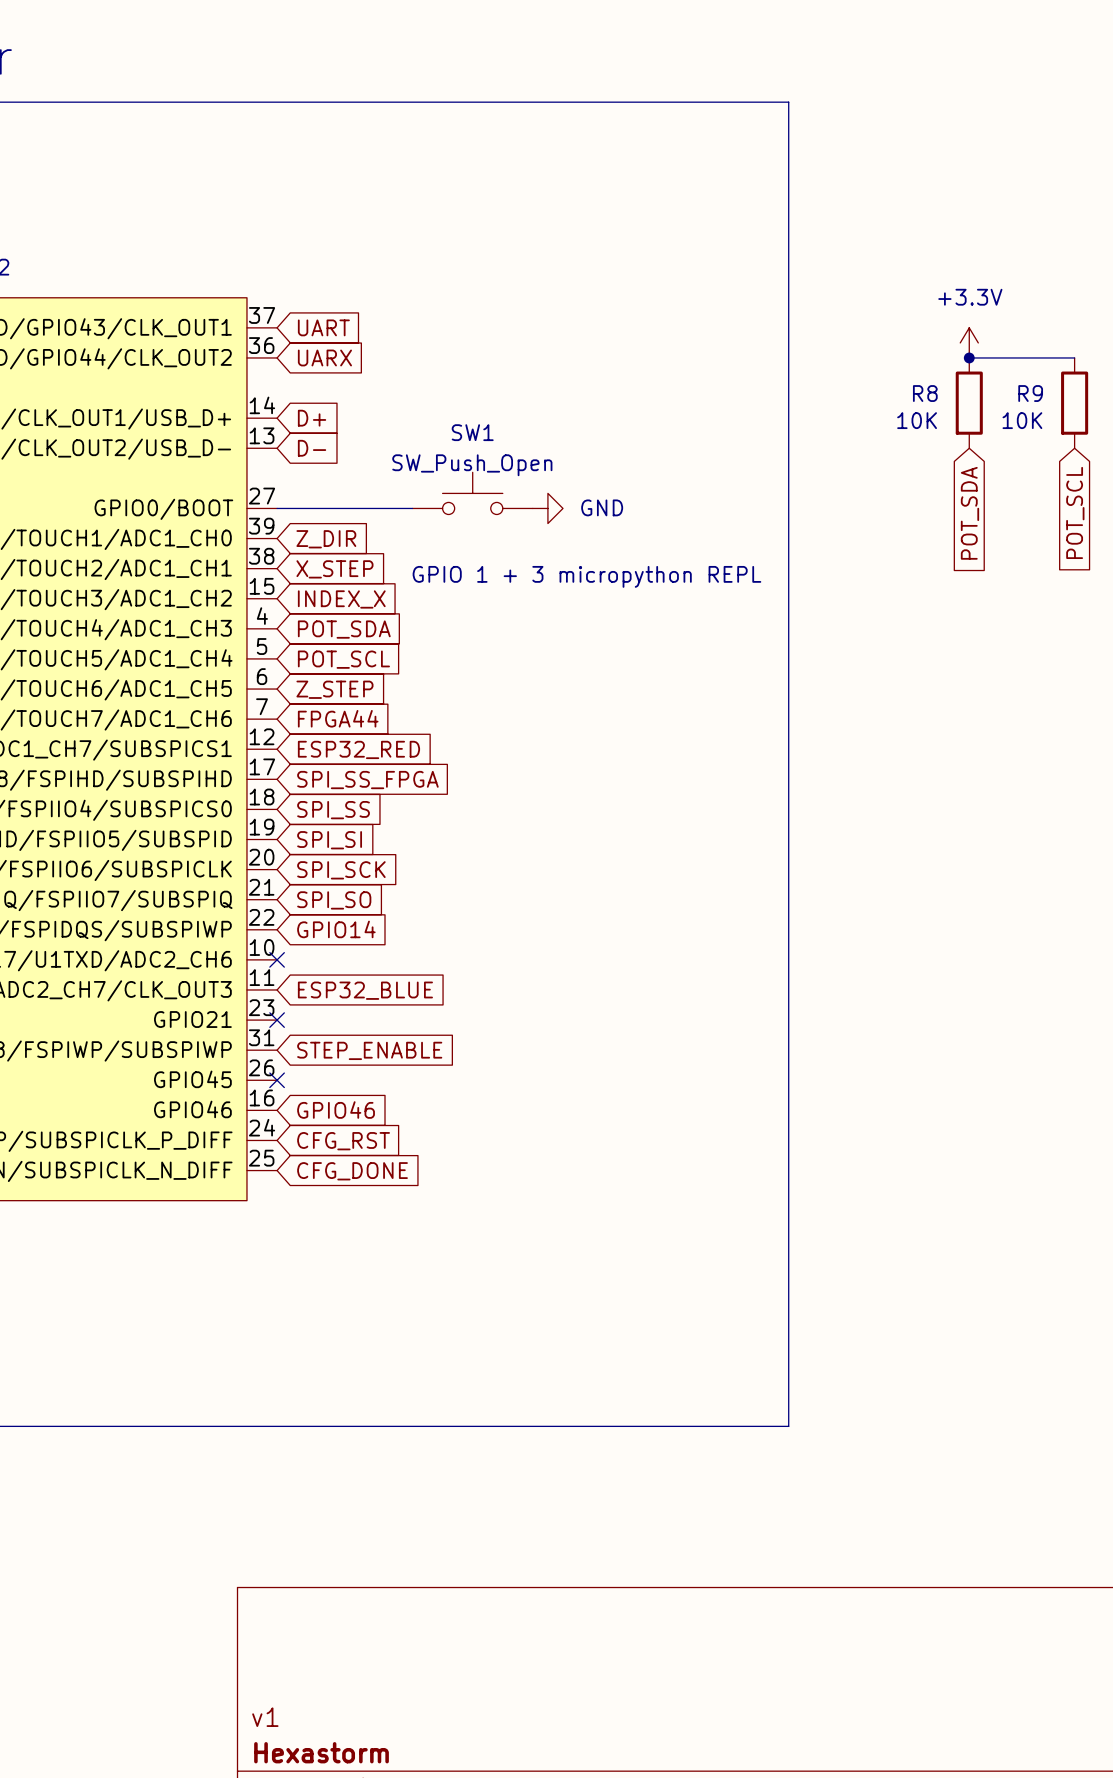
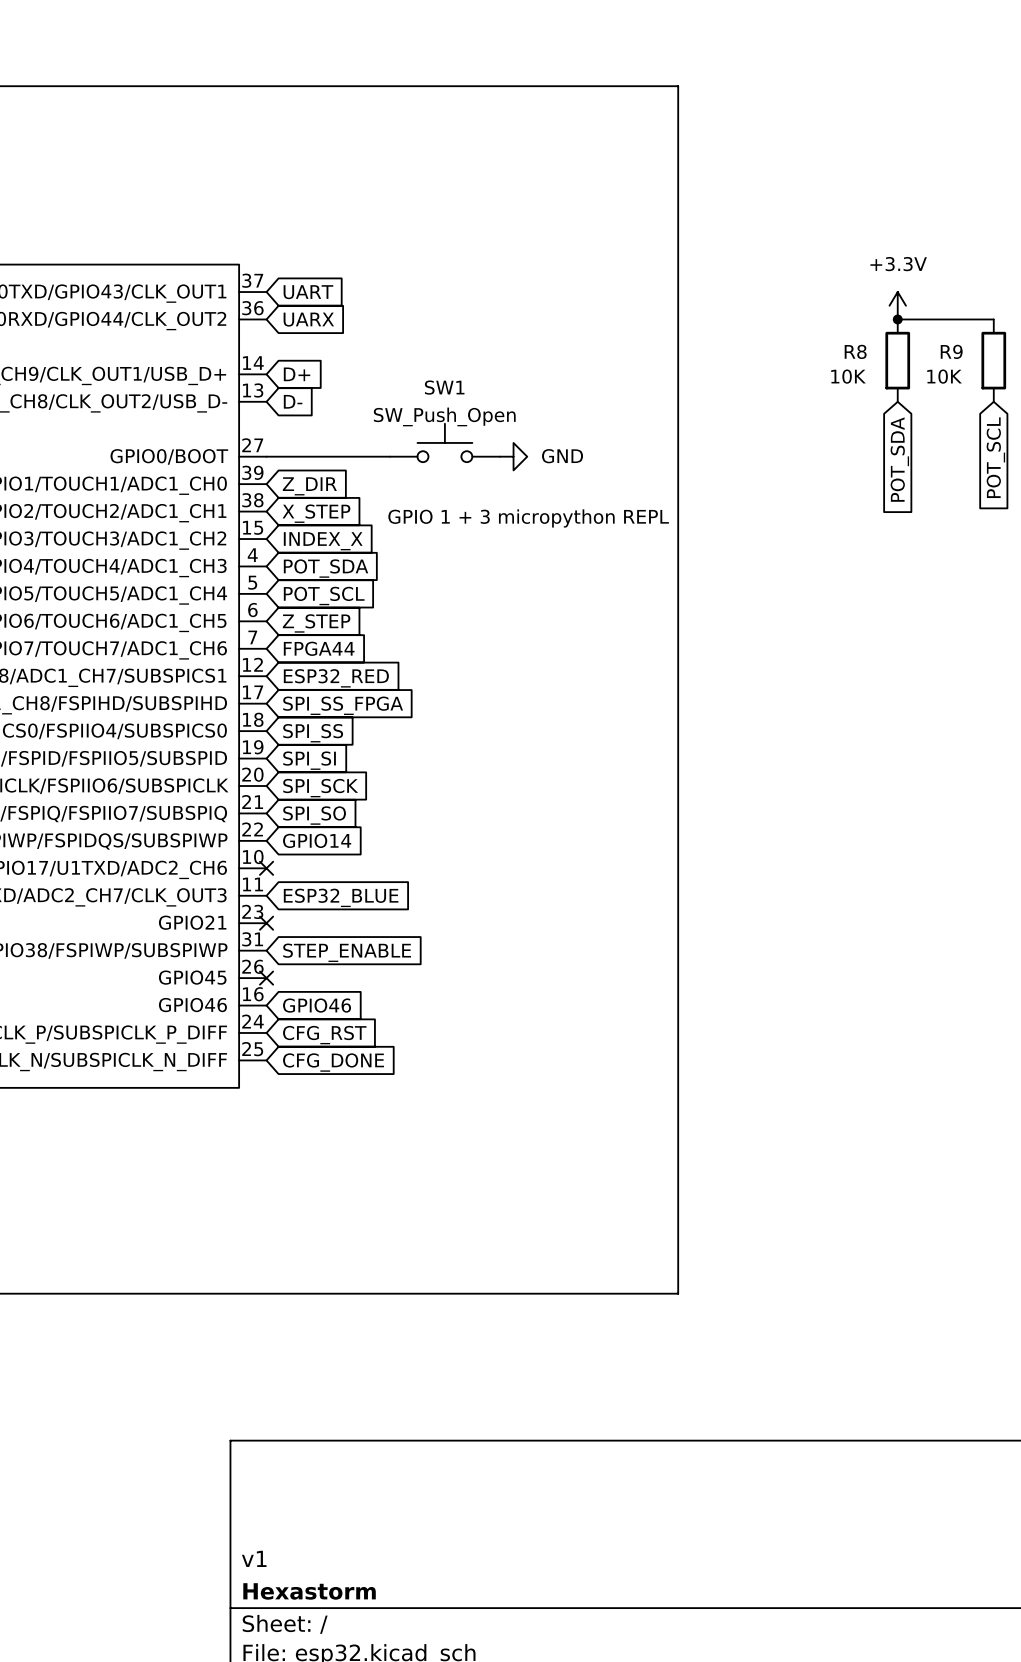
line: (728, 102) (788, 102) (788, 1426) (728, 1426) -> (678, 86) (678, 1293)

